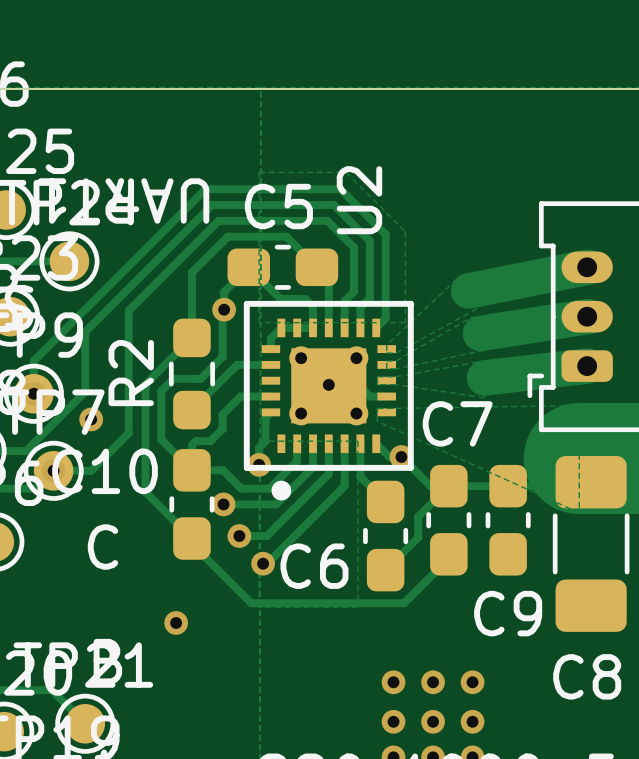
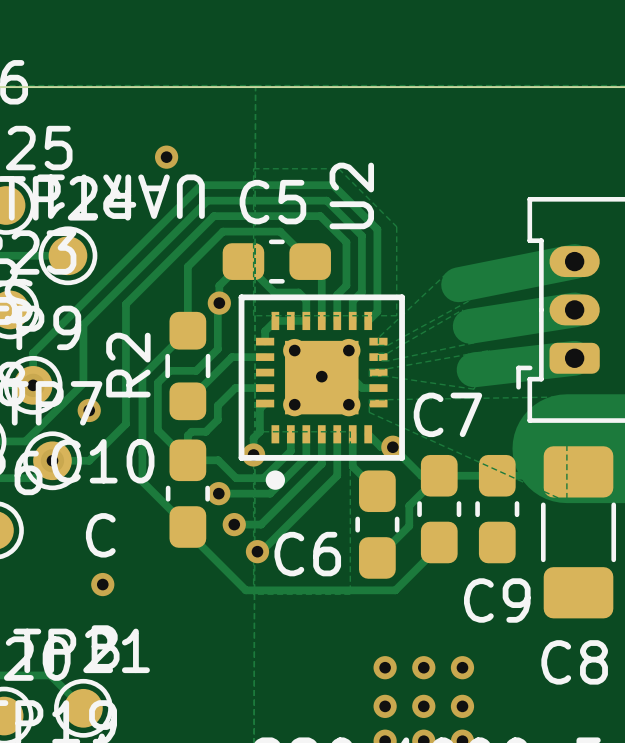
via: none -> (166, 157)
via position: (176, 622) -> (102, 584)

